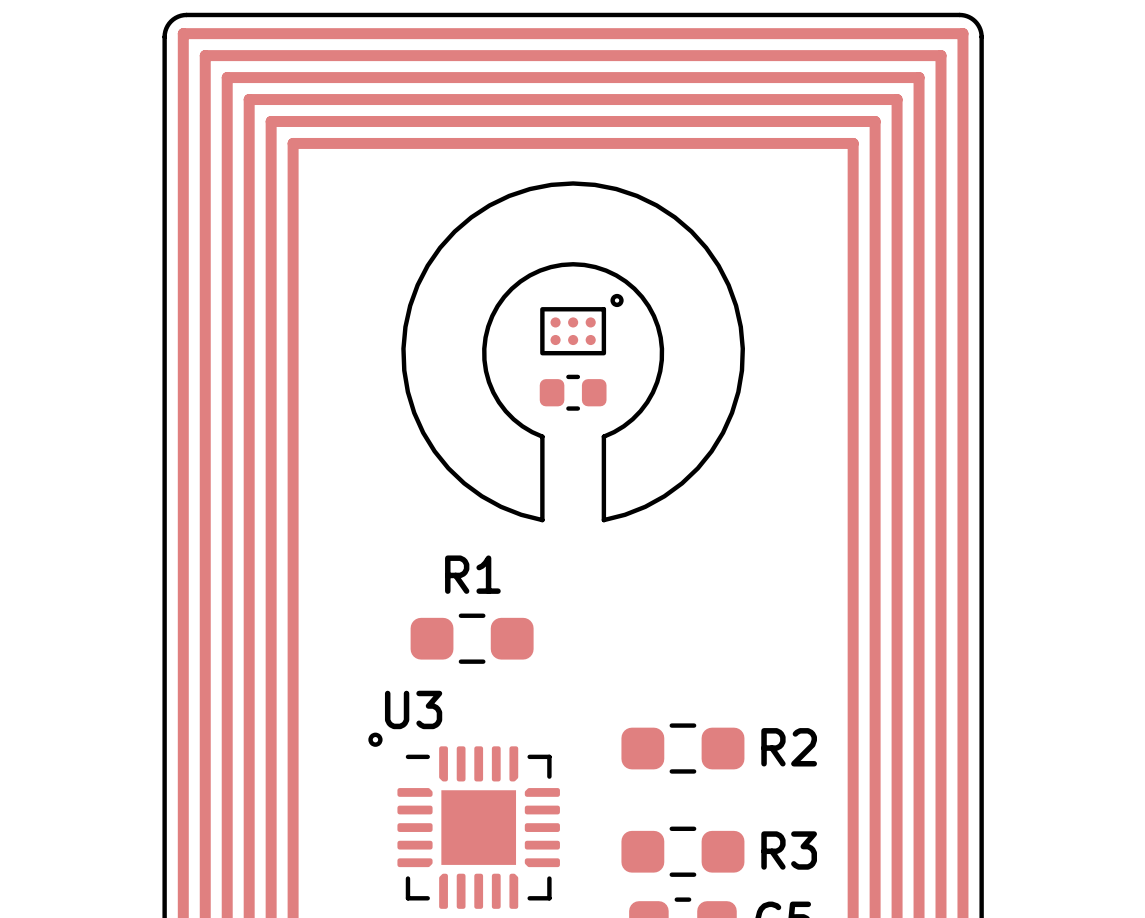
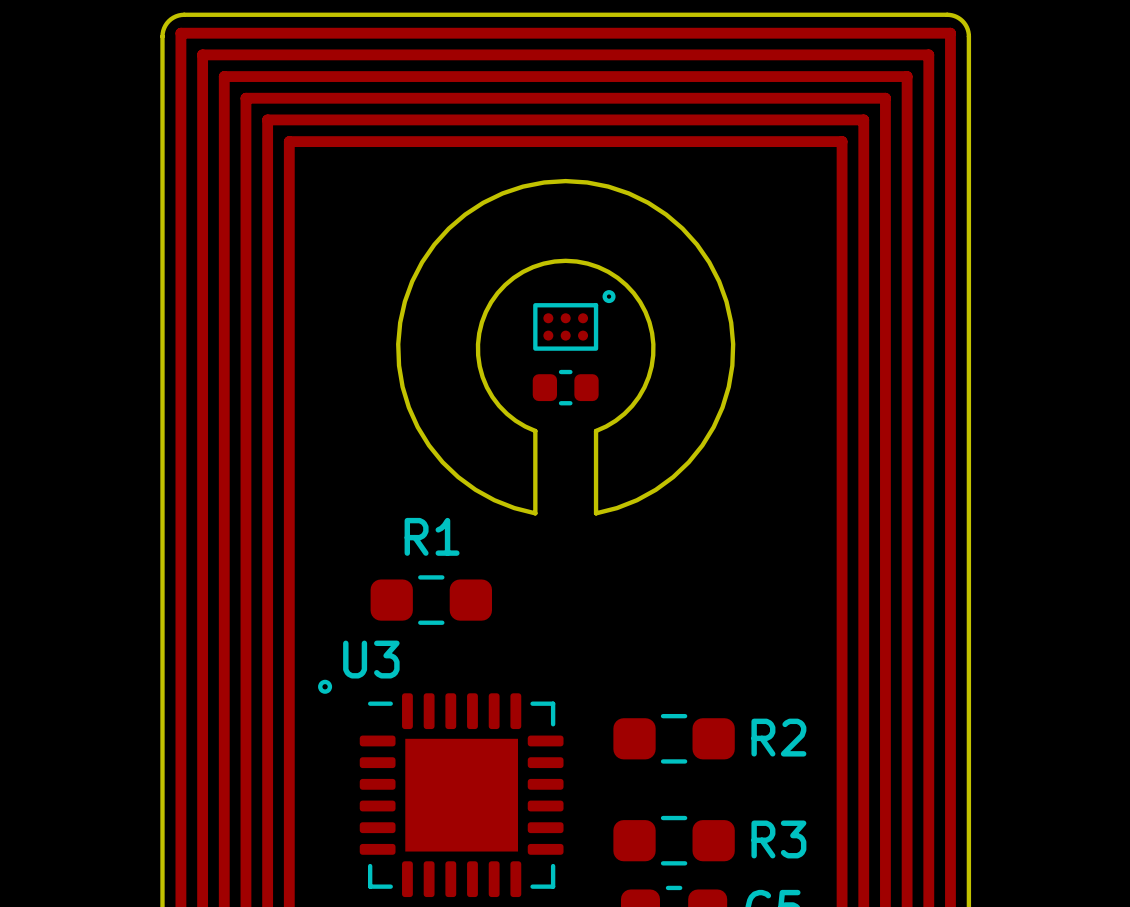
R1 position: (472, 638) -> (431, 600)
drawing position: (375, 739) -> (325, 686)
U3 footprint: [397, 746, 560, 909] -> [359, 693, 564, 898]

